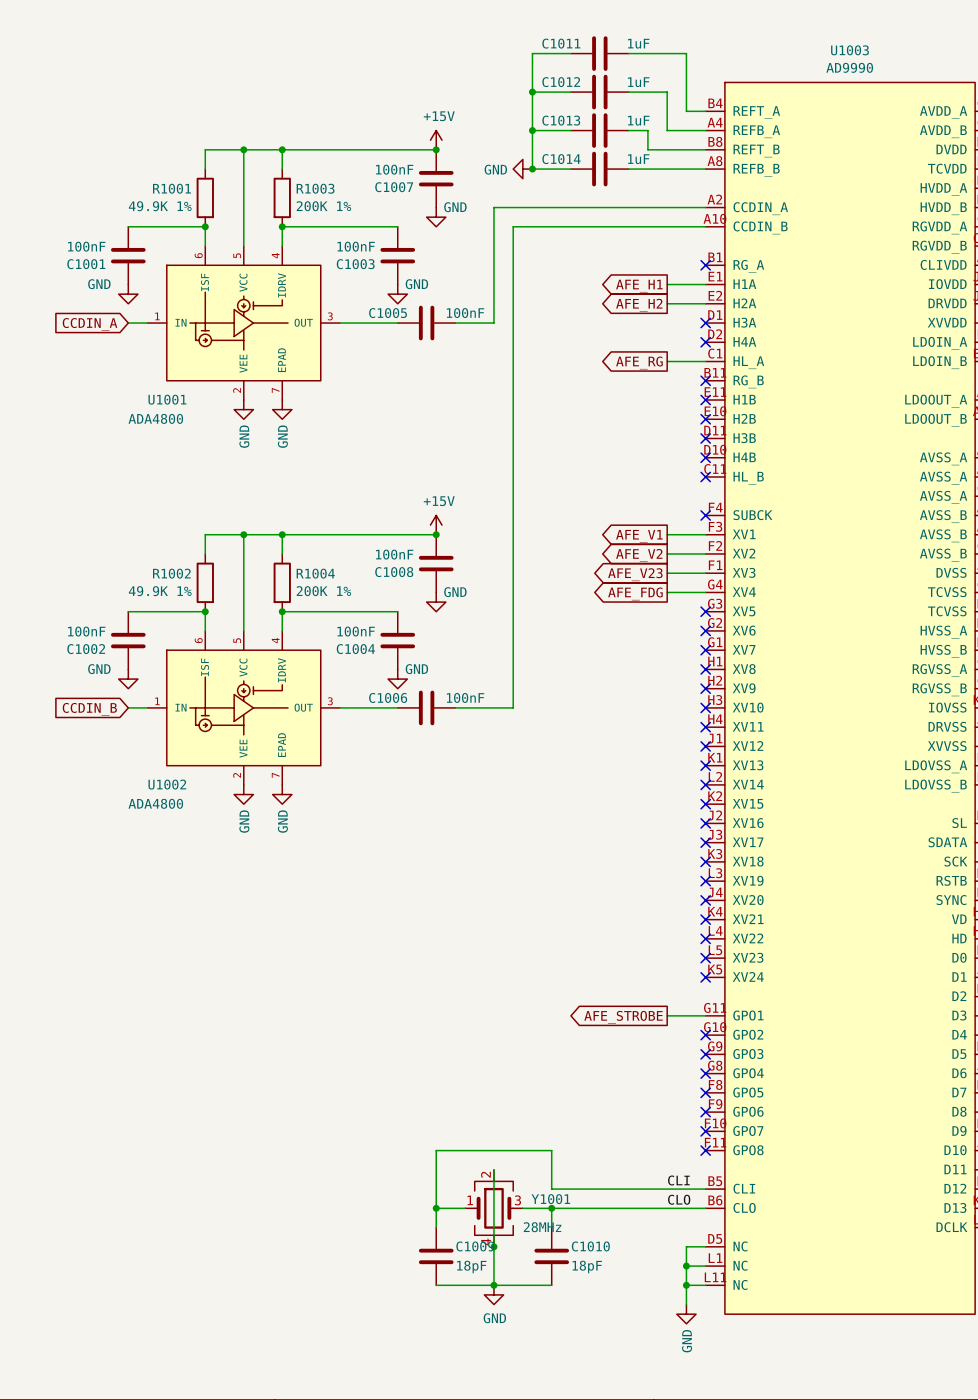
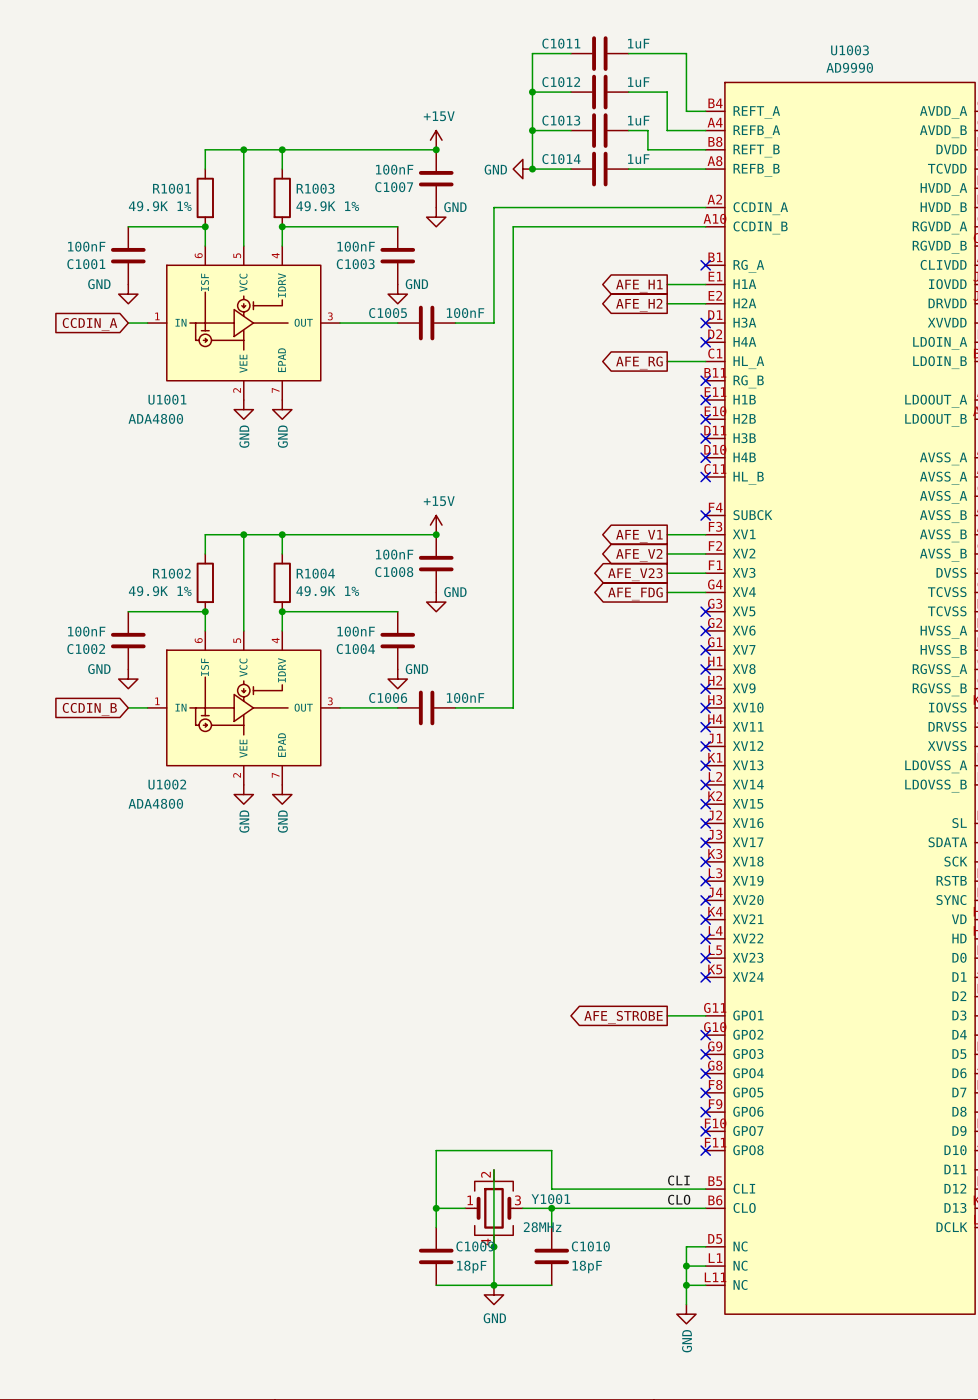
R1003 value: 200K 1% (323, 206) -> 49.9K 1% (327, 206)
R1004 value: 200K 1% (323, 591) -> 49.9K 1% (327, 591)

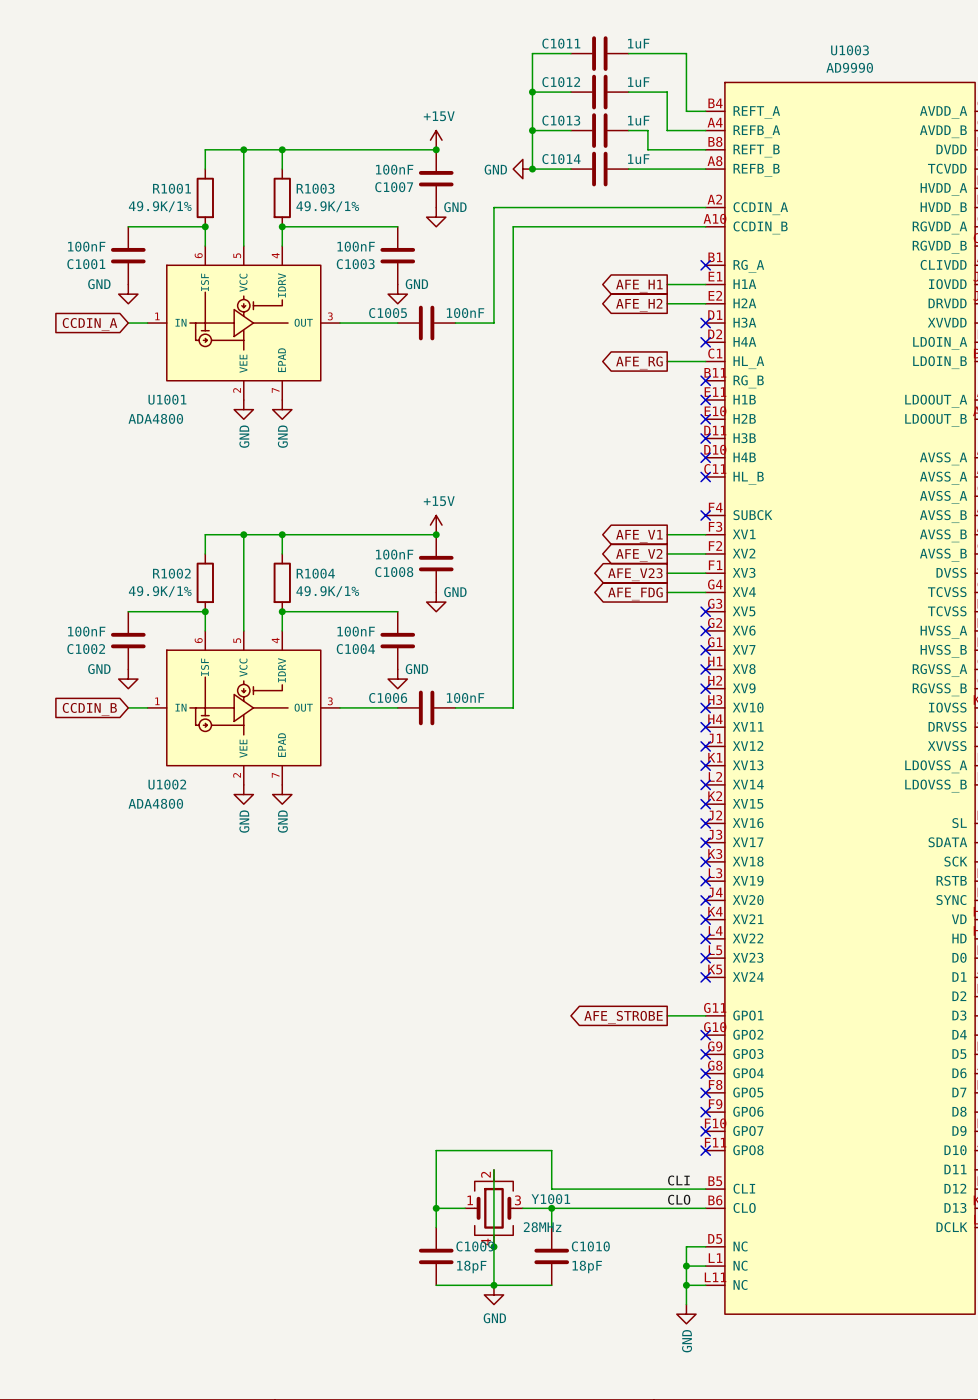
R1001 value: 49.9K 1% (160, 206) -> 49.9K/1% (160, 206)
R1003 value: 49.9K 1% (327, 206) -> 49.9K/1% (327, 206)
R1002 value: 49.9K 1% (160, 591) -> 49.9K/1% (160, 591)
R1004 value: 49.9K 1% (327, 591) -> 49.9K/1% (327, 591)

